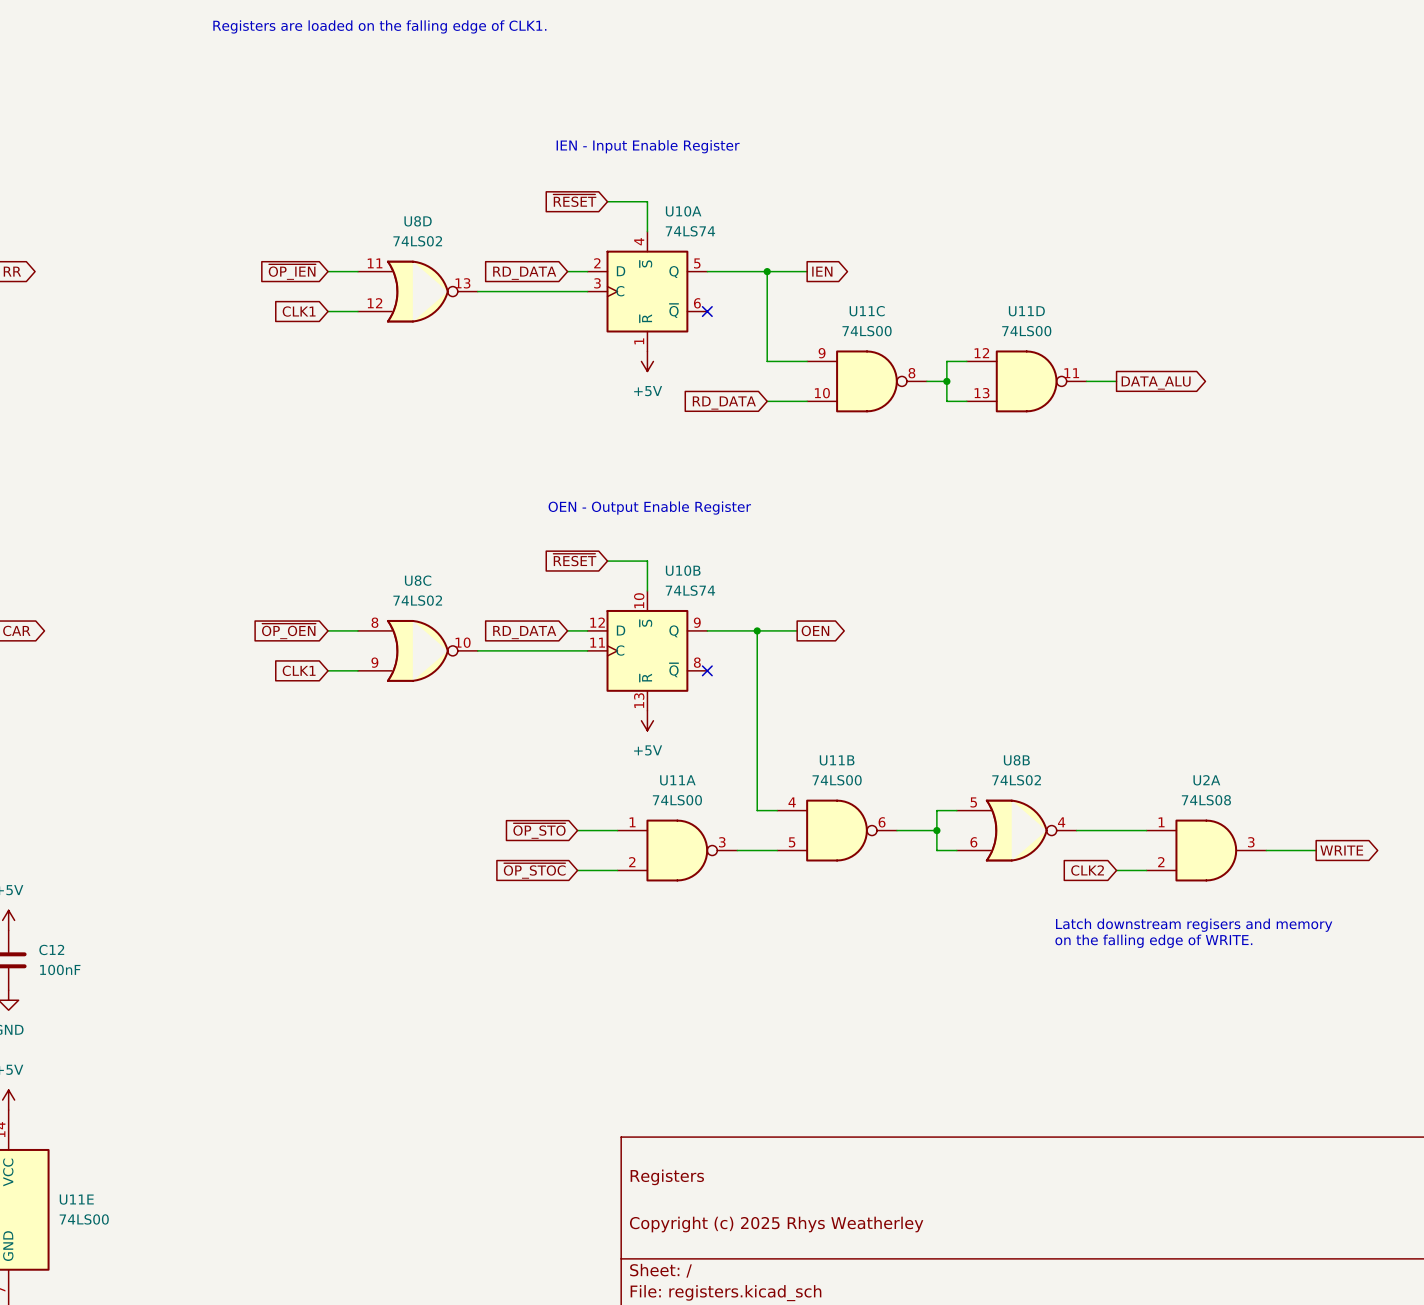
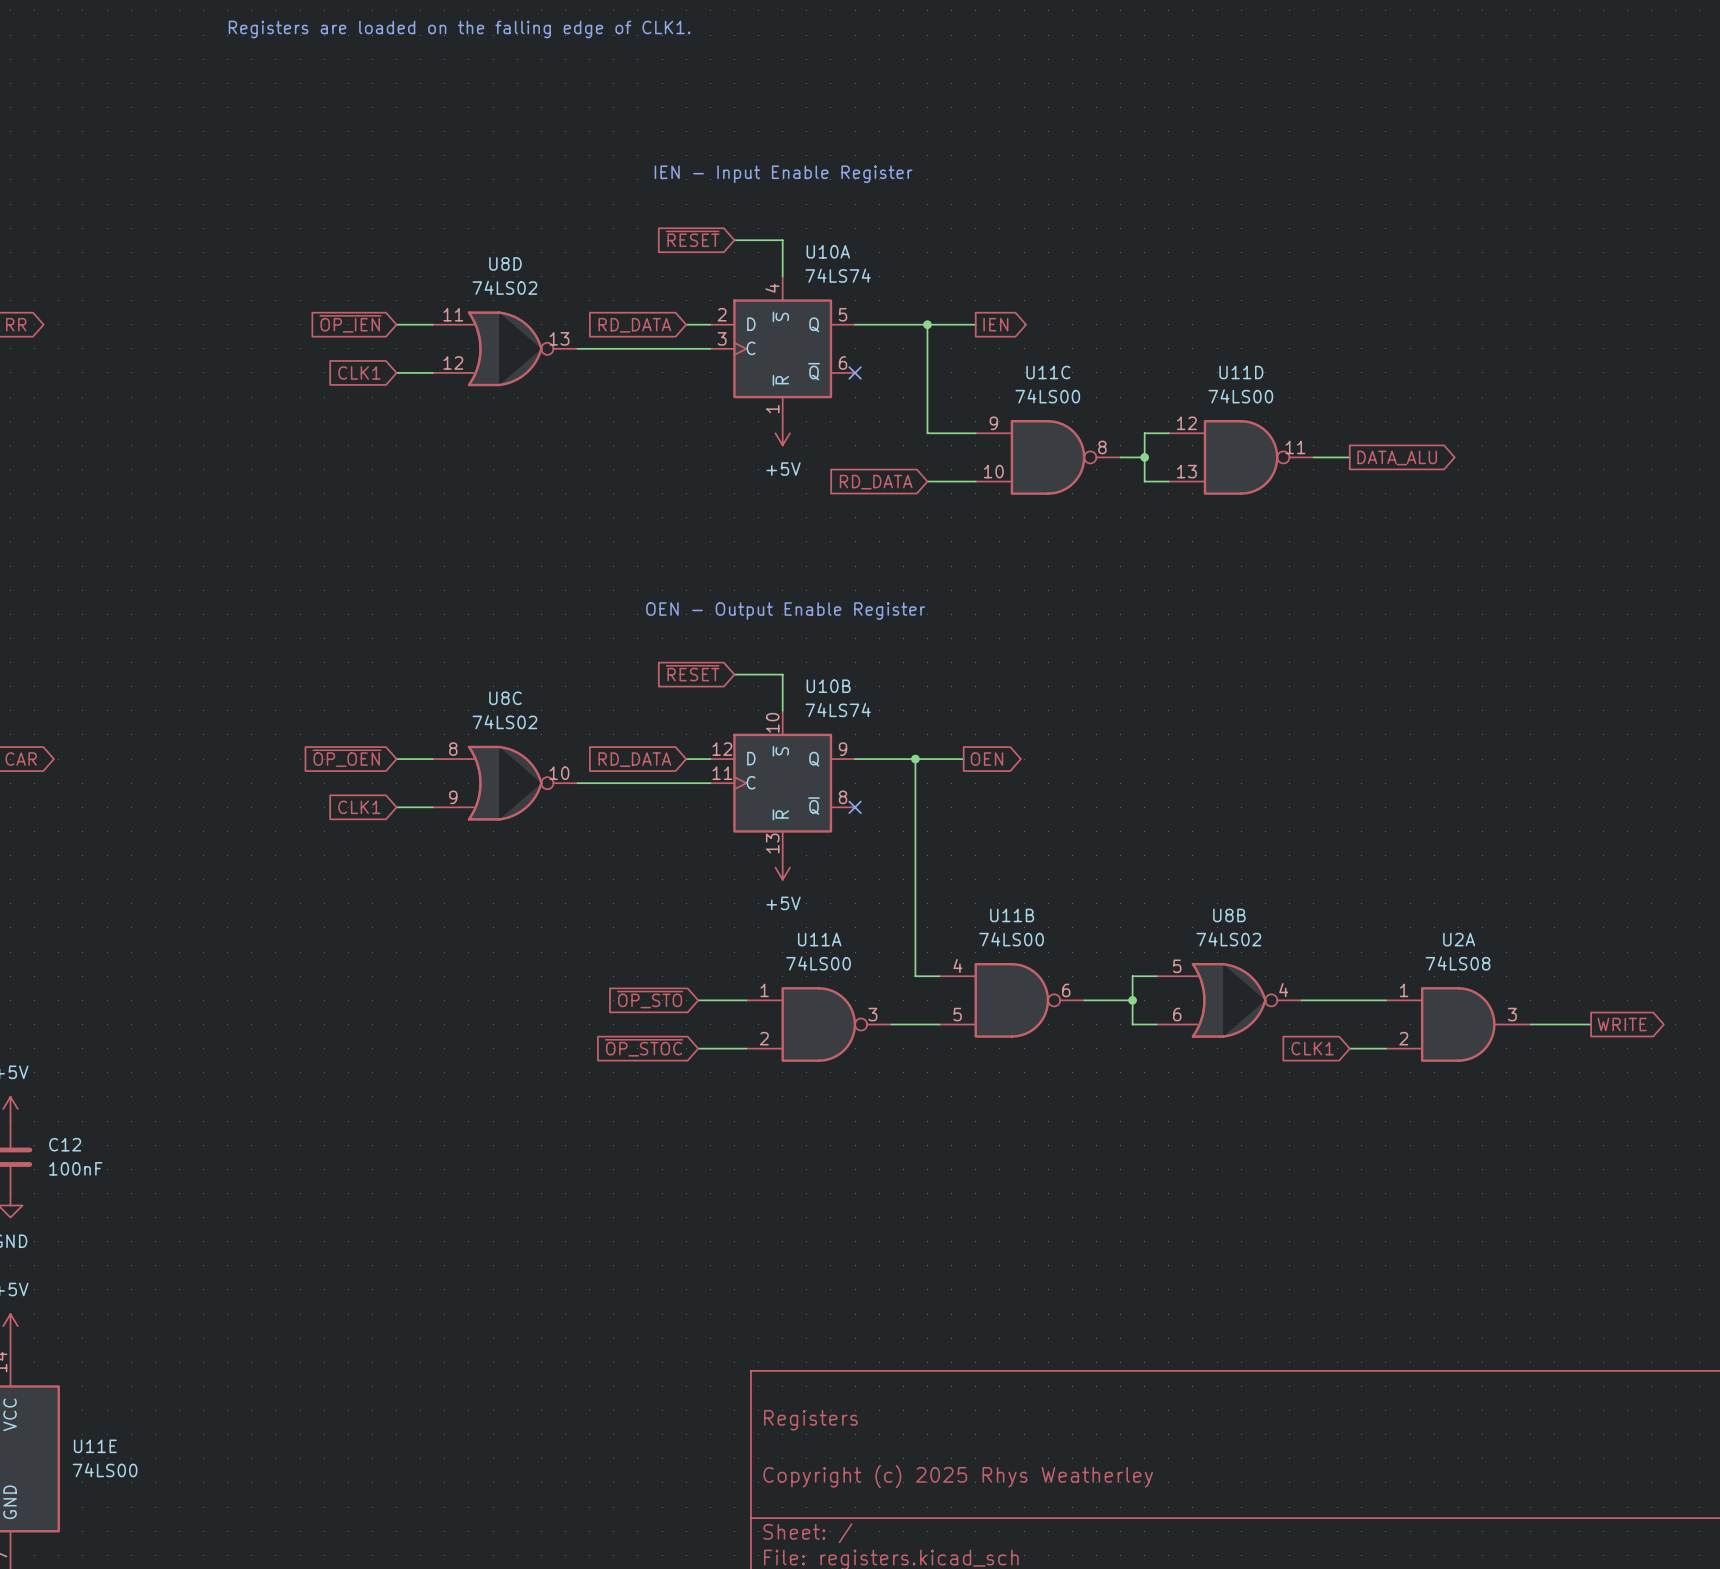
global label: CLK2 (1087, 870) -> CLK1 (1312, 1048)
text: Latch downstream regisers and memory (1194, 925) -> none
text: on the falling edge of WRITE. (1153, 941) -> none

